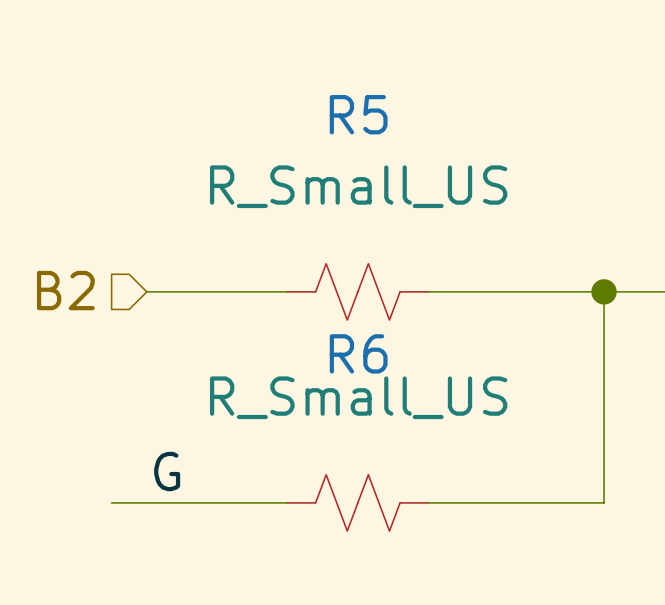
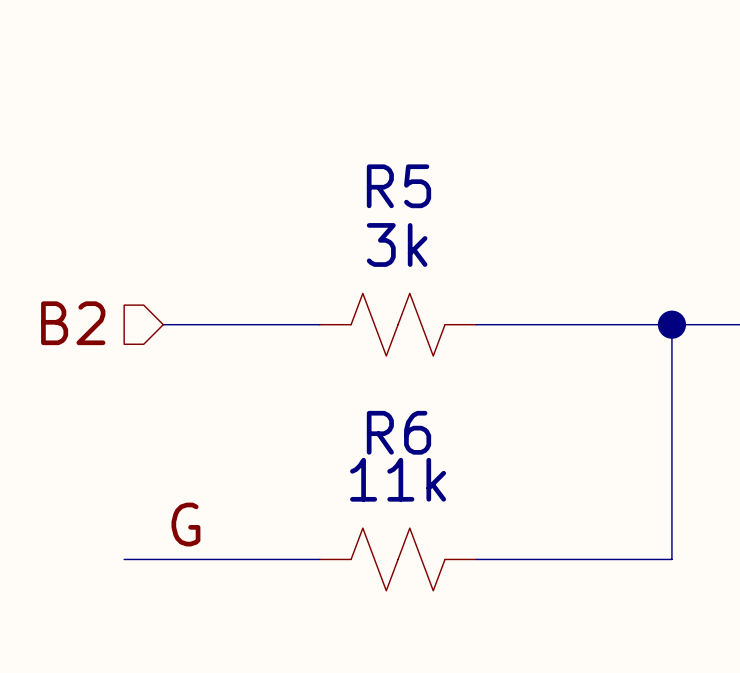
R5 name position: R5 (358, 114) -> R5 (398, 186)
R5 value: R_Small_US (358, 186) -> 3k (397, 244)
R6 name position: R6 (358, 353) -> R6 (398, 432)
R6 value: R_Small_US (358, 397) -> 11k (398, 479)

